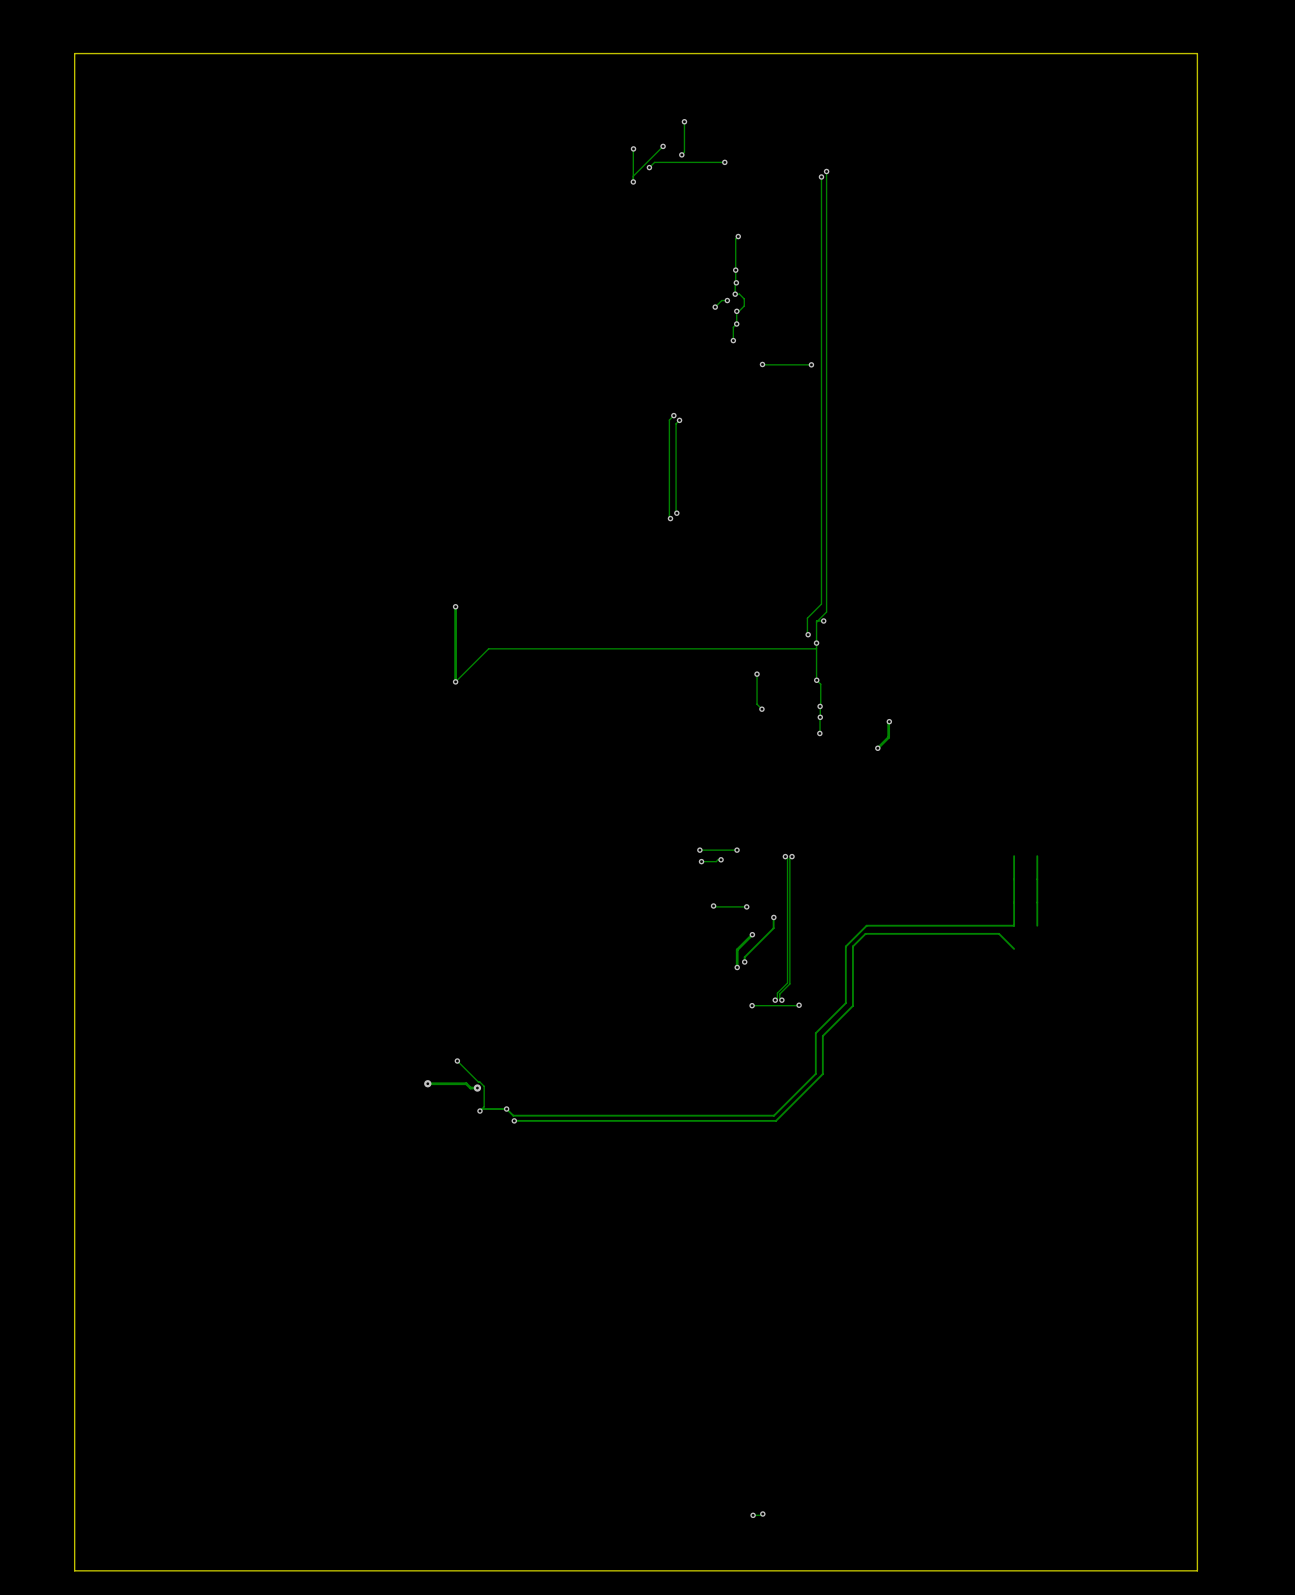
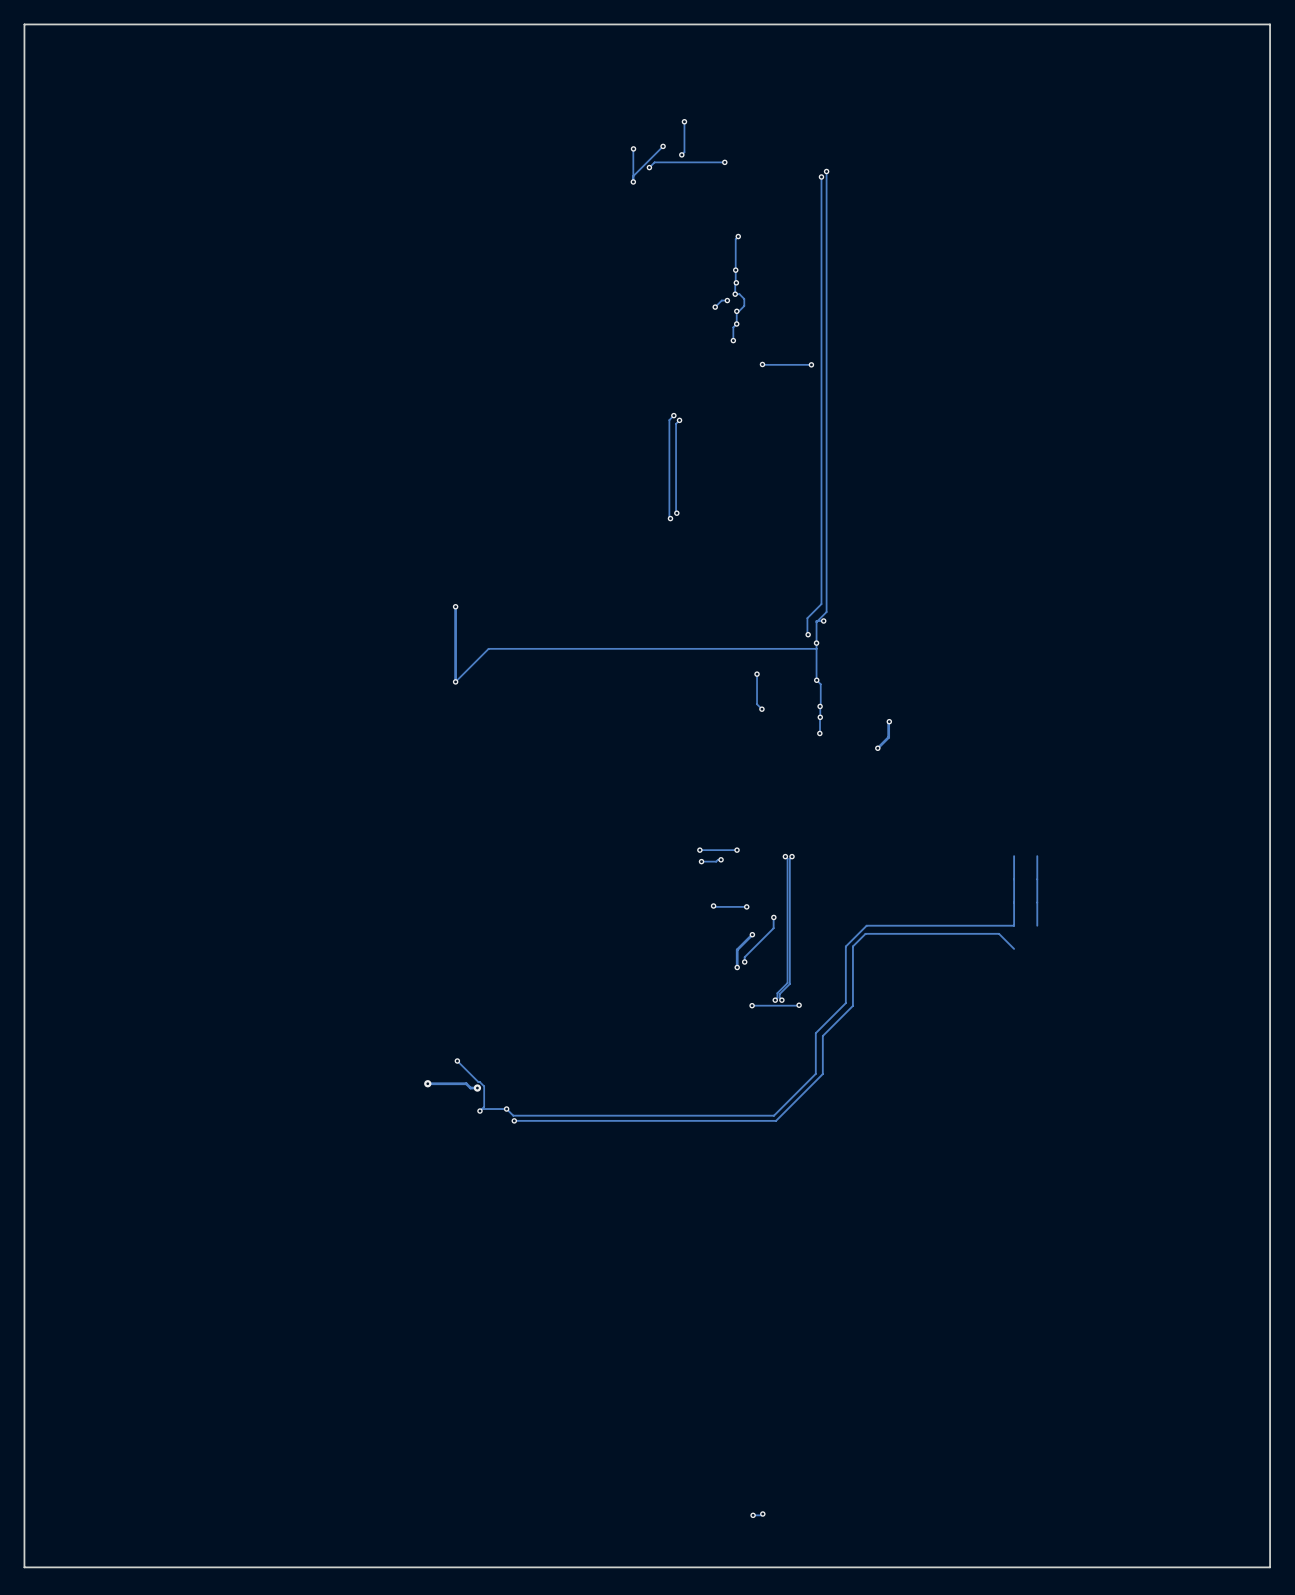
board edge: (1197, 53) (74, 53) (74, 1570) (1197, 1570) (1197, 53) -> (1270, 24) (1270, 1567) (24, 1567) (24, 24) (1270, 24)

